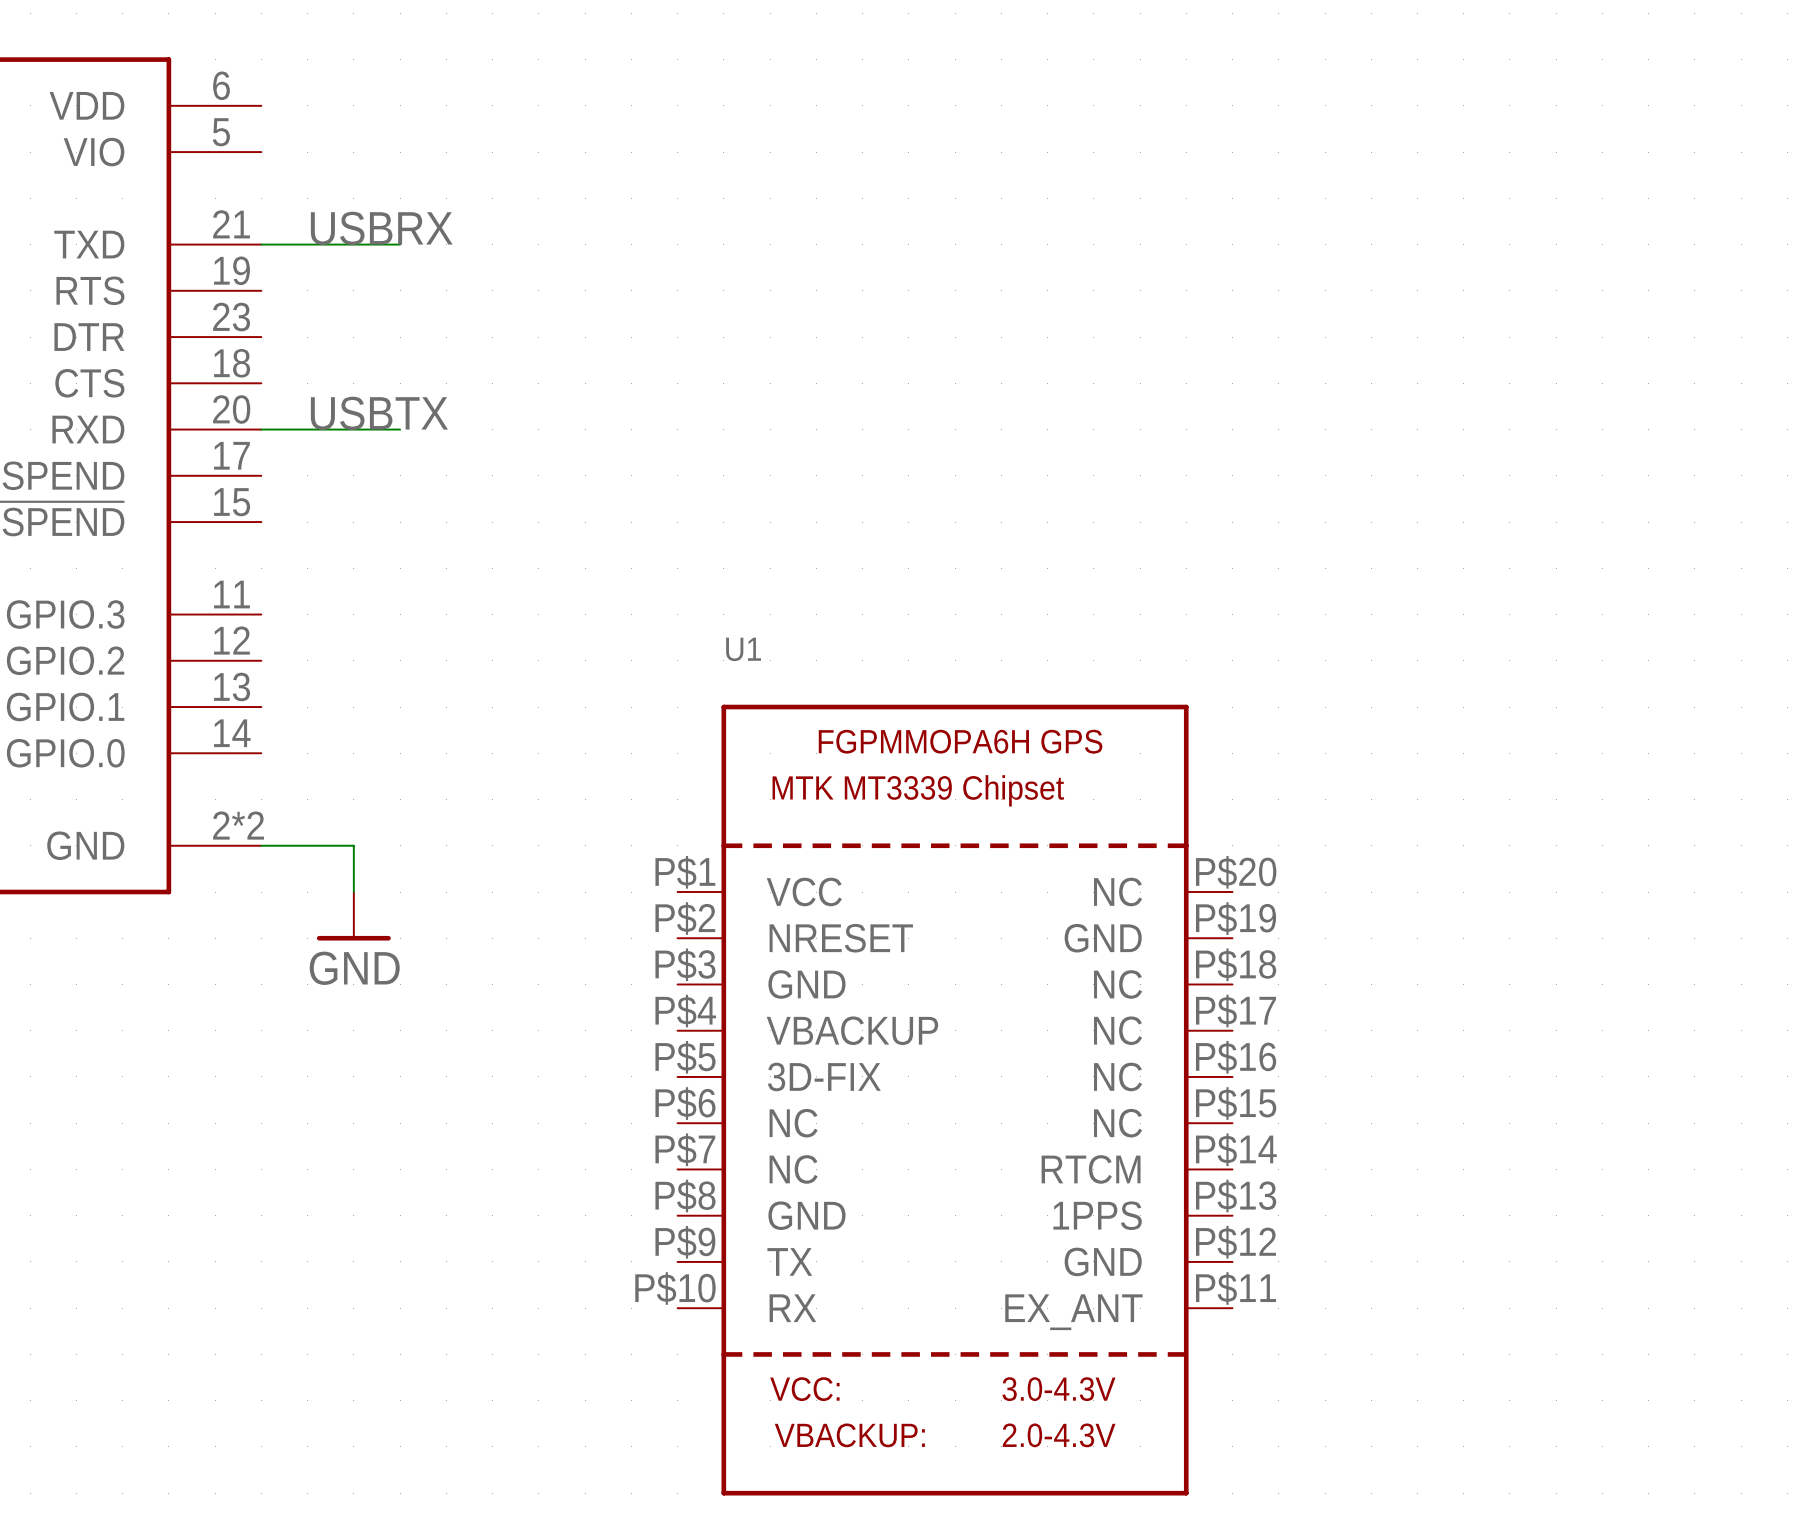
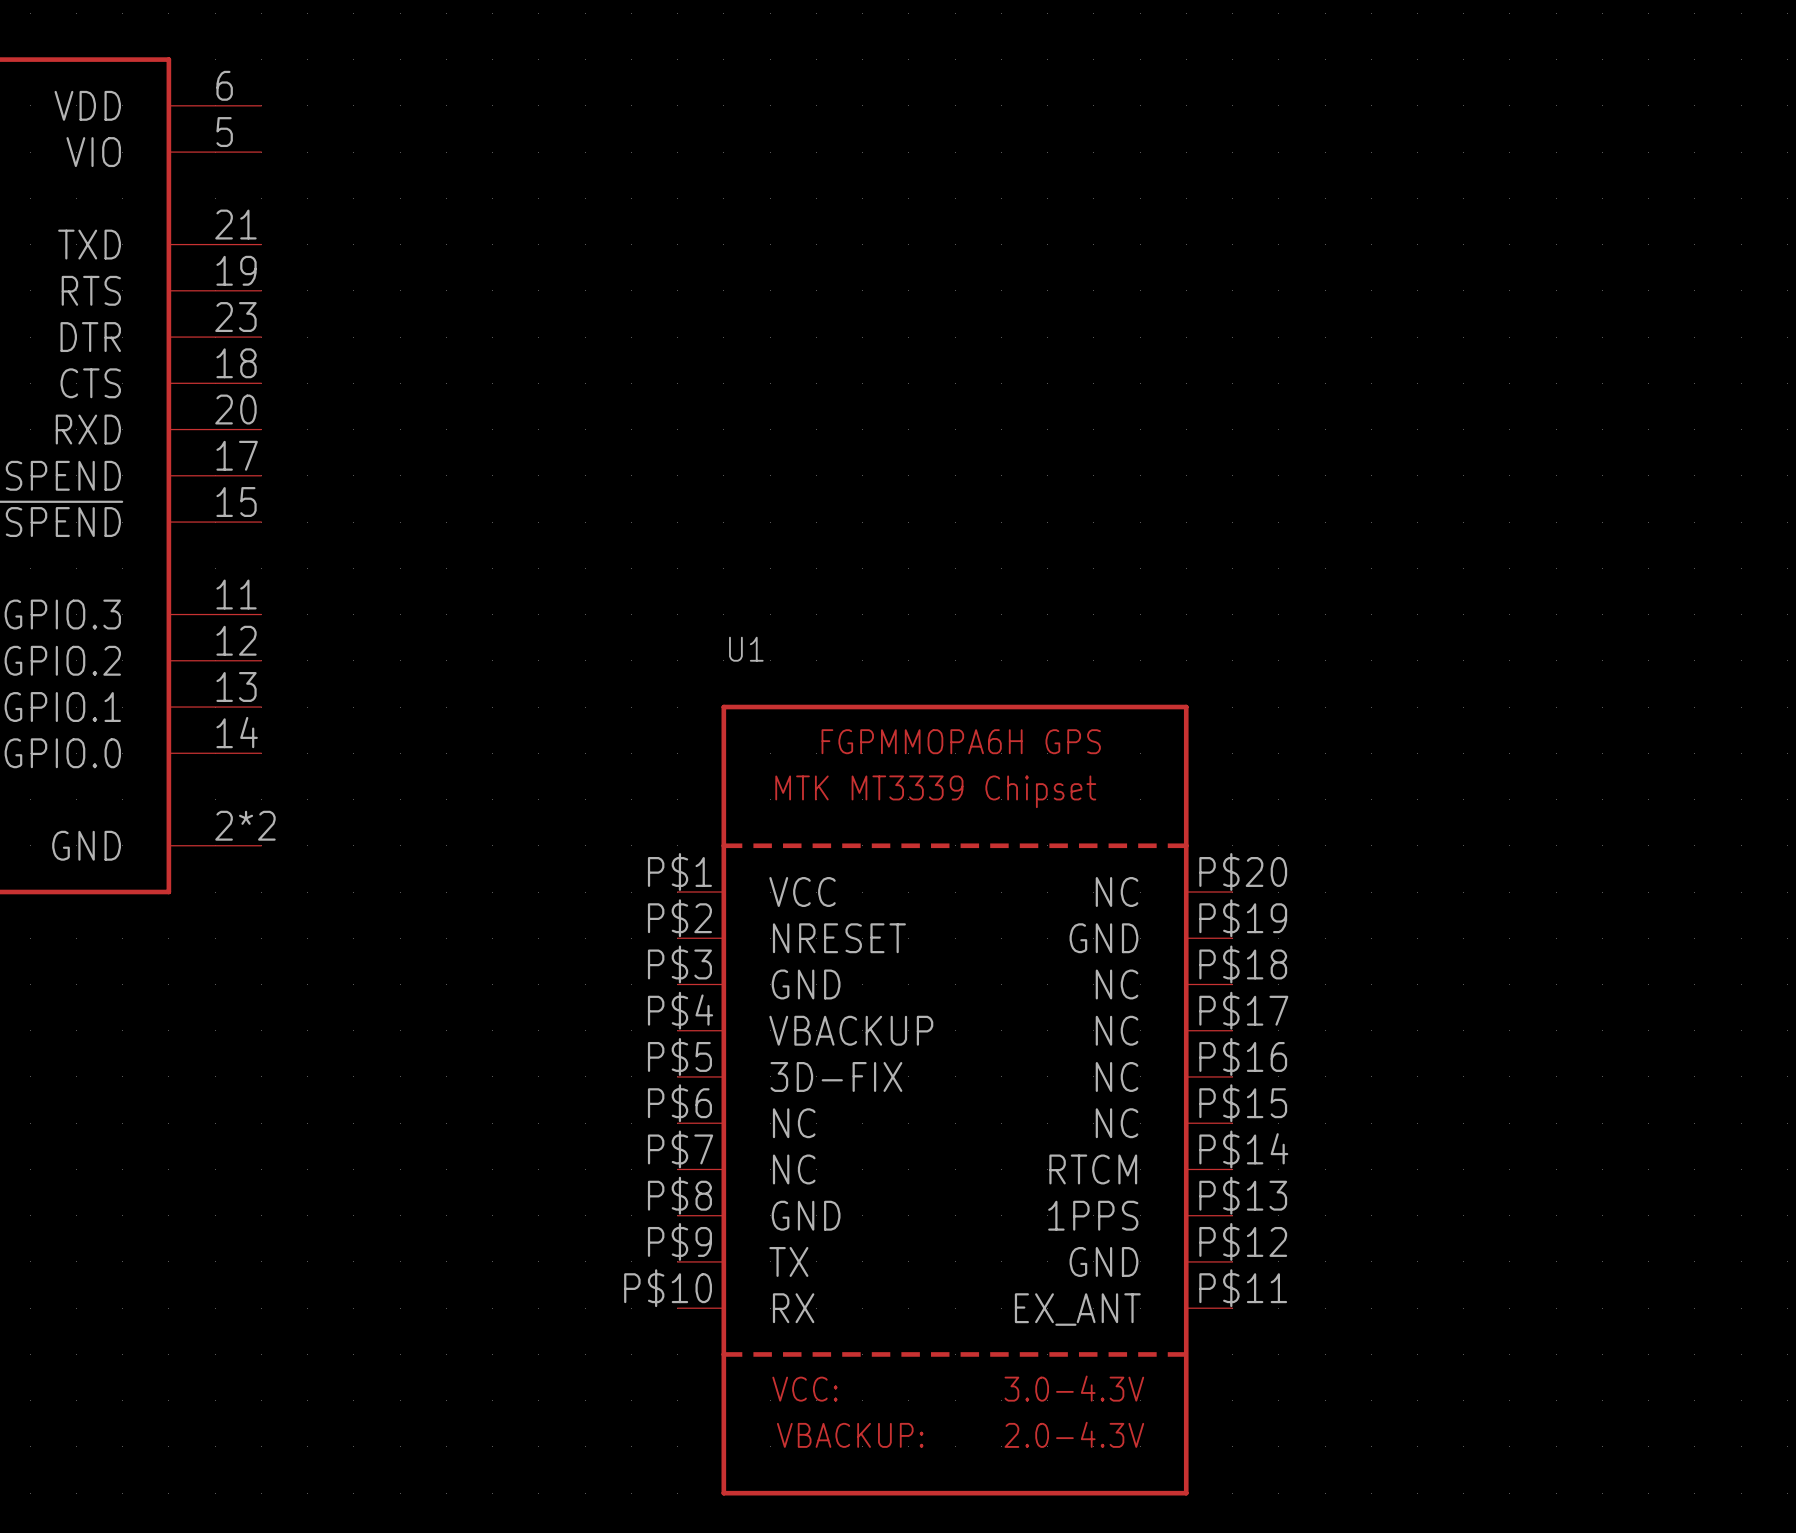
label: USBRX (381, 228) -> none
wire: (261, 244) (400, 244) -> none
label: USBTX (379, 413) -> none
wire: (261, 429) (400, 429) -> none
wire: (261, 845) (353, 845) (353, 892) -> none
power symbol: GND (353, 916) -> none

